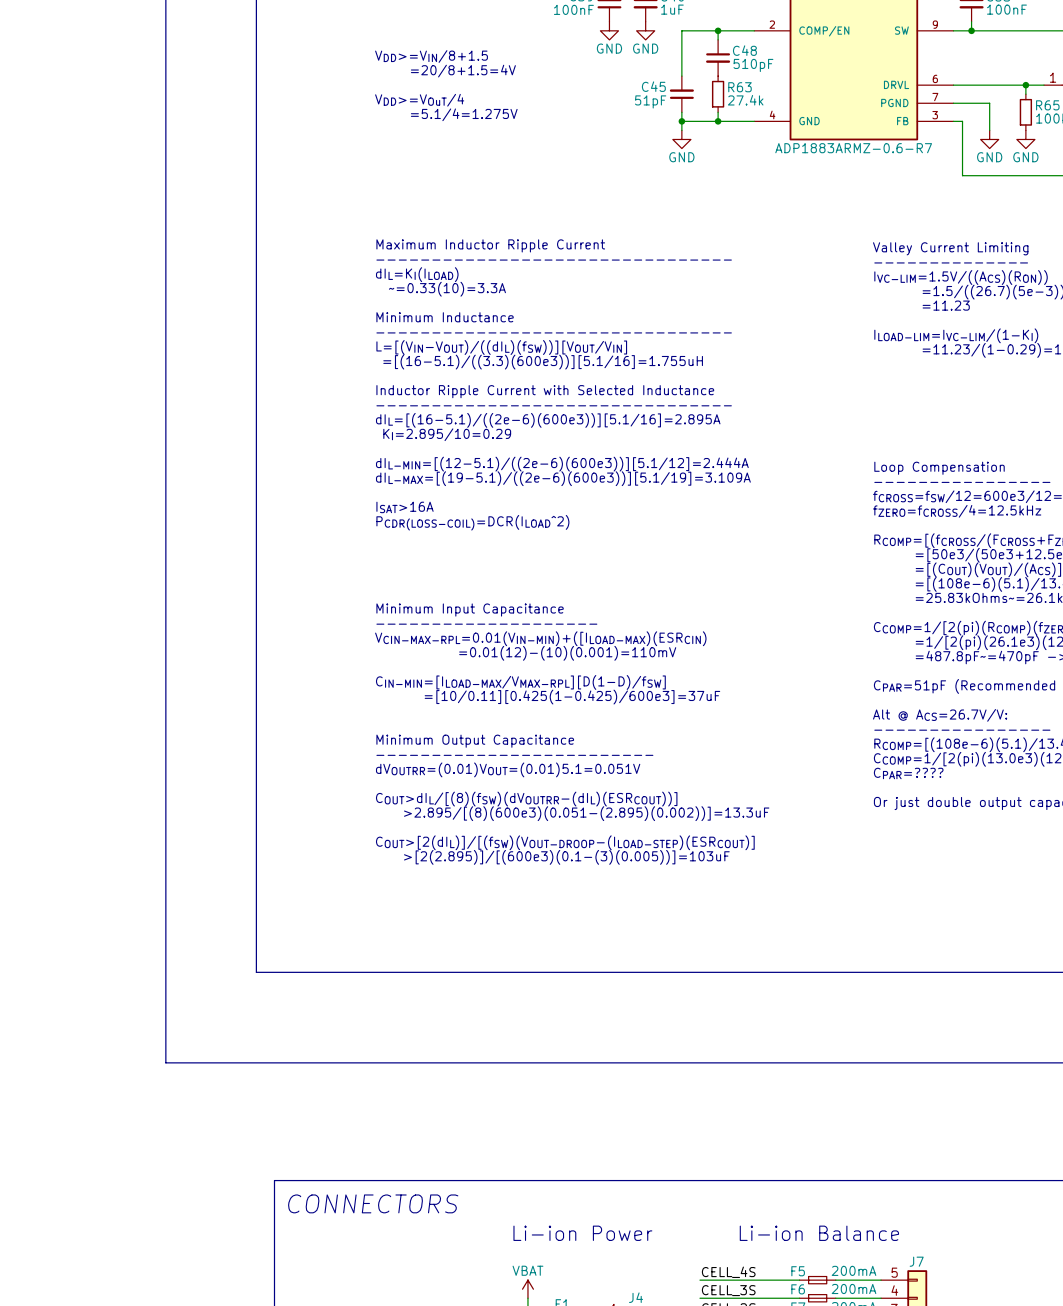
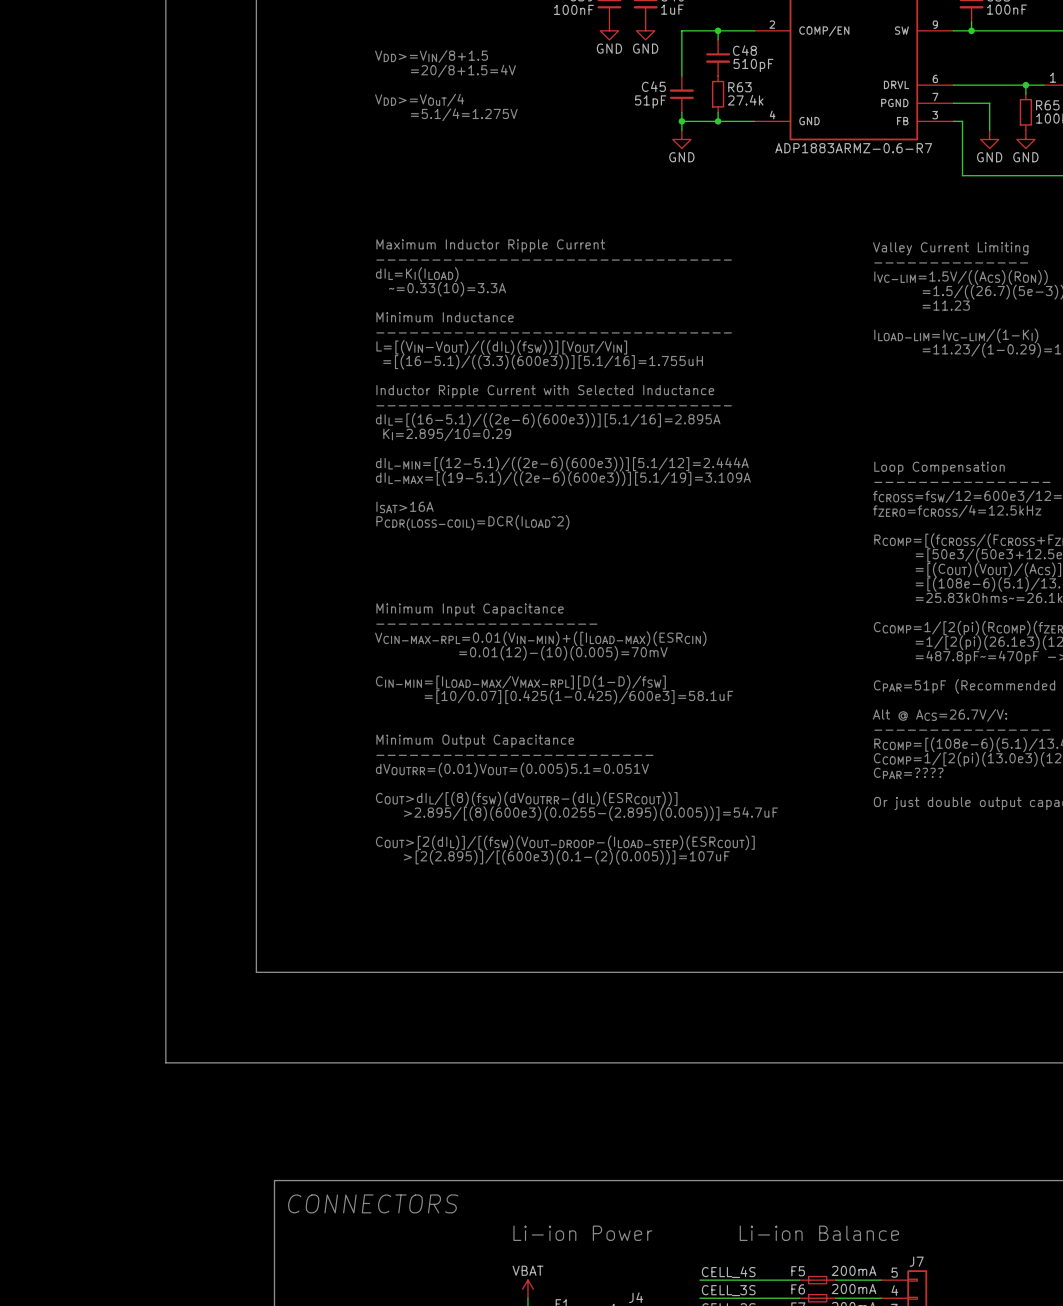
text: =0.01(12)-(10)(0.001)=110mV (567, 653) -> =0.01(12)-(10)(0.005)=70mV (563, 653)
text: =[10/0.11][0.425(1-0.425)/600e3]=37uF (572, 697) -> =[10/0.07][0.425(1-0.425)/600e3]=58.1uF (578, 697)
text: dVOUTRR=(0.01)VOUT=(0.01)5.1=0.051V (508, 769) -> dVOUTRR=(0.01)VOUT=(0.005)5.1=0.051V (512, 769)
text: >2.895/[(8)(600e3)(0.051-(2.895)(0.002))]=13.3uF (586, 813) -> >2.895/[(8)(600e3)(0.0255-(2.895)(0.005))]=54.7uF (590, 813)
text: >[2(2.895)]/[(600e3)(0.1-(3)(0.005))]=103uF (566, 857) -> >[2(2.895)]/[(600e3)(0.1-(2)(0.005))]=107uF (566, 857)

